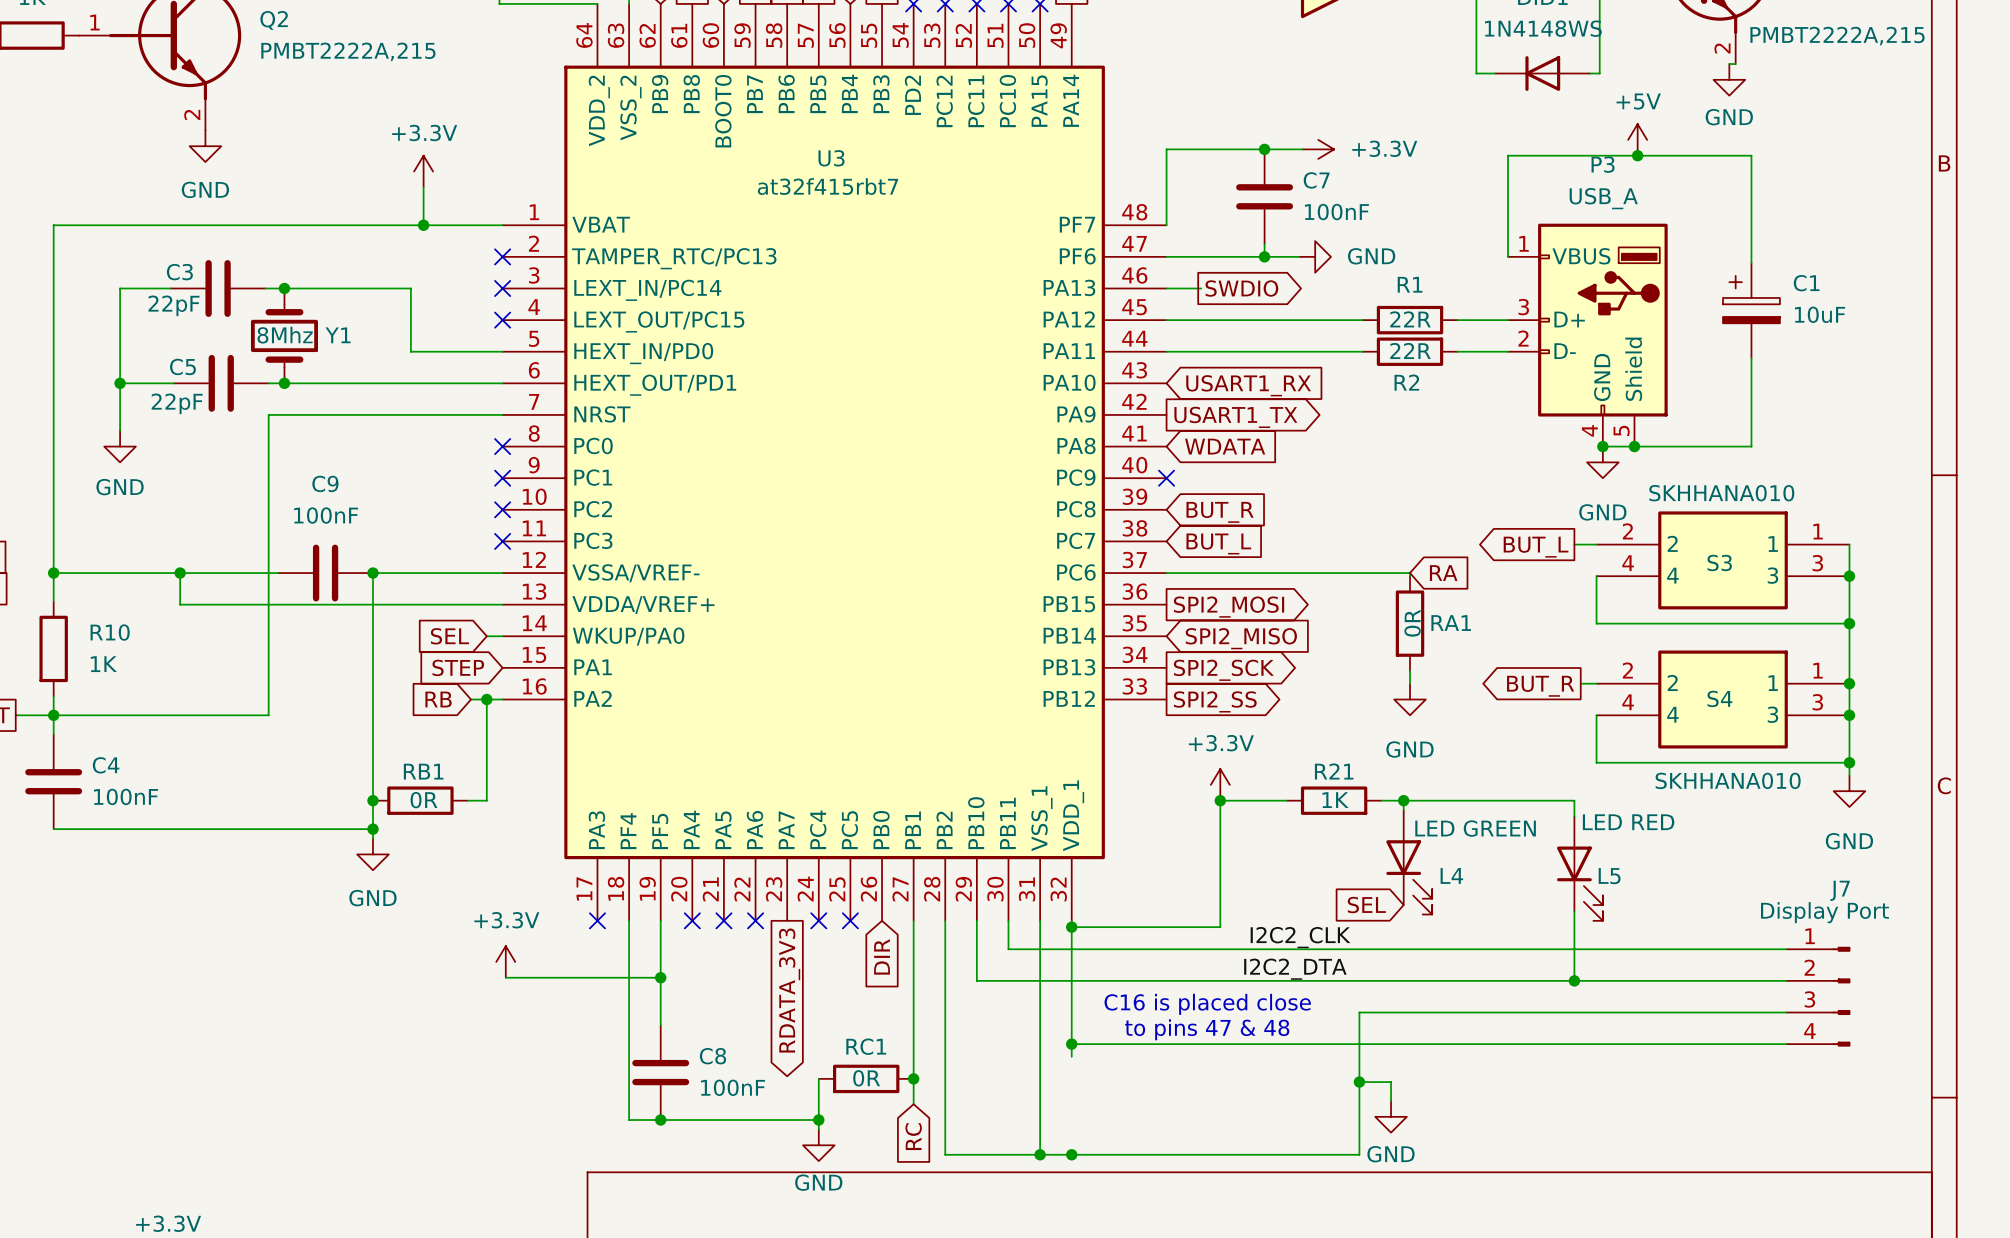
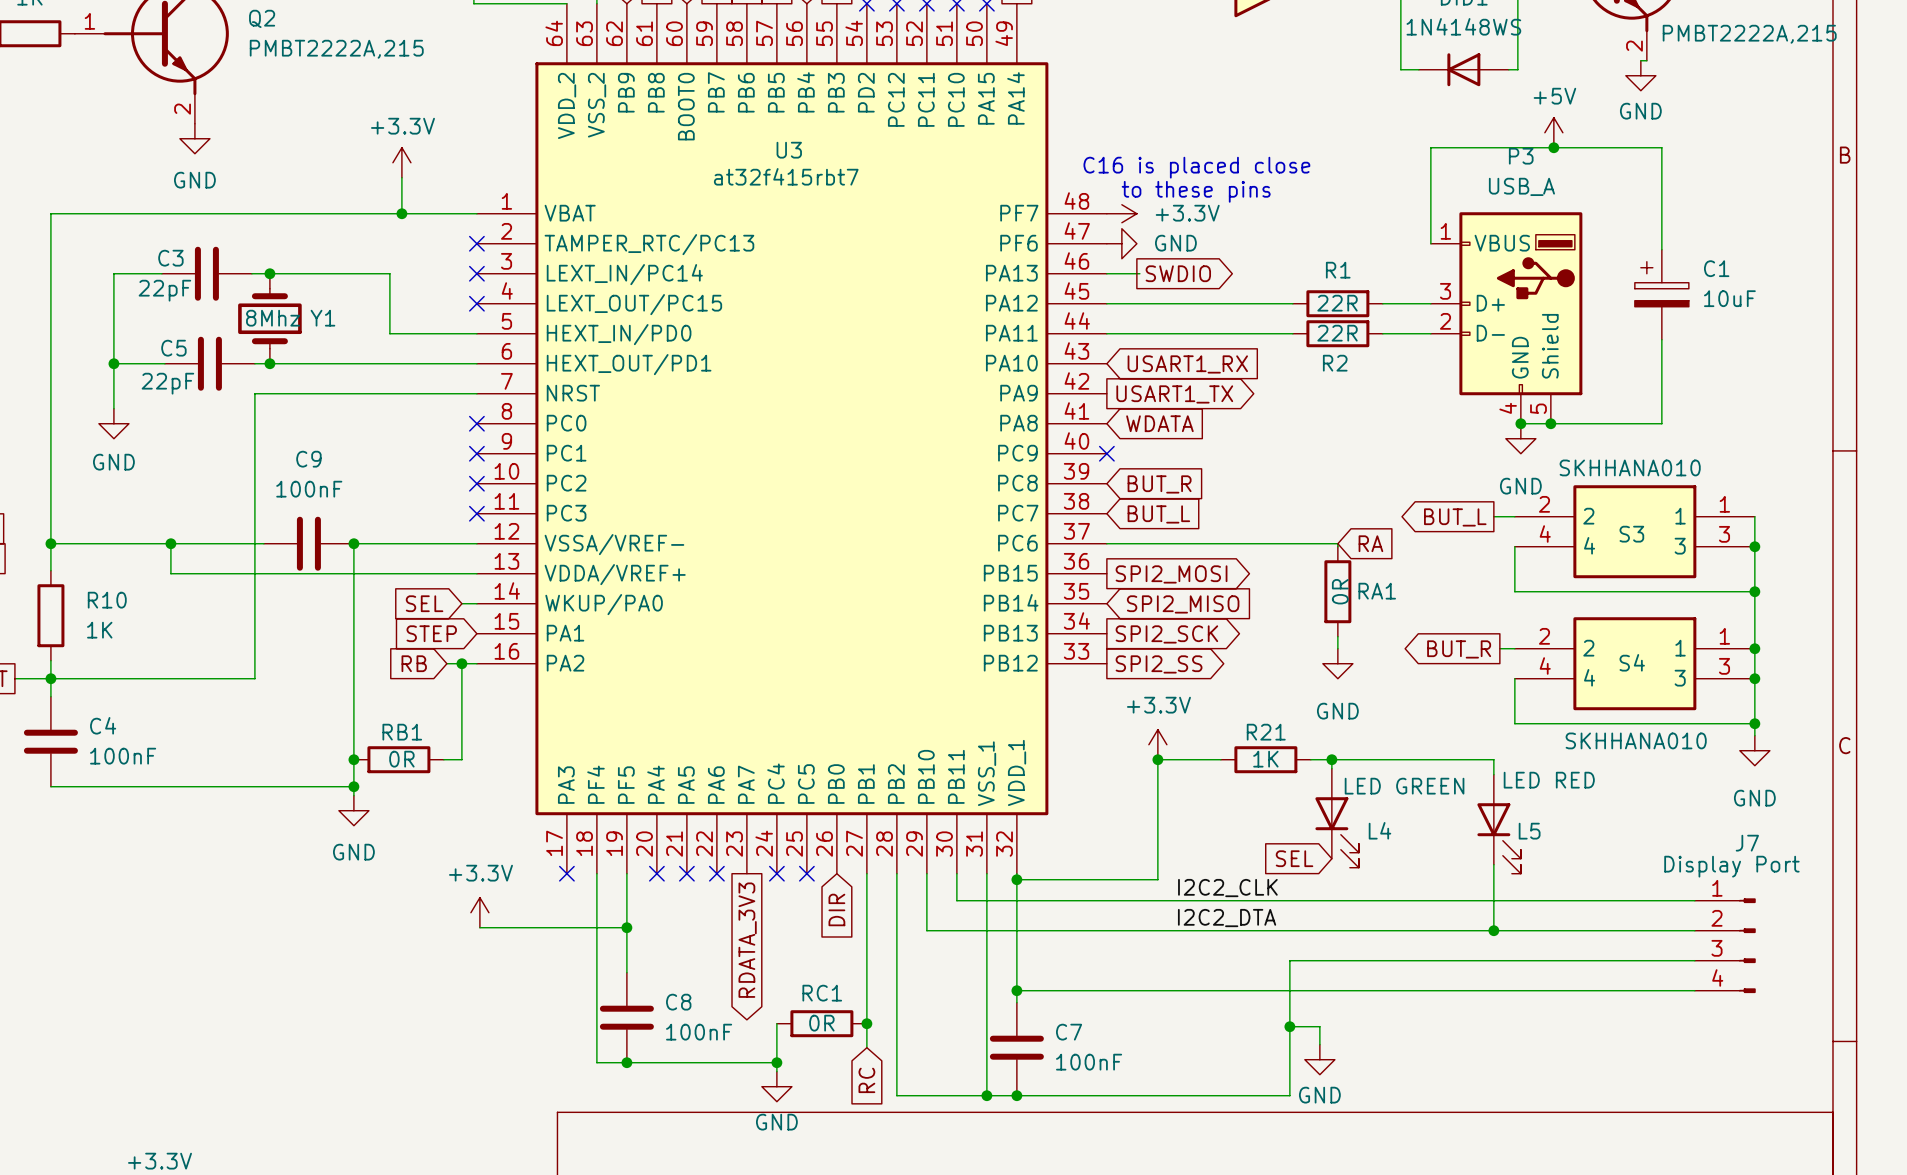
junction: (1264, 149) -> none
wire: (1302, 149) (1166, 149) (1166, 225) -> none
power symbol position: +3.3V (1318, 149) -> +3.3V (1121, 213)
text: none -> C16 is placed close (1196, 167)
C7 position: (1264, 196) -> (1016, 1047)
text: none -> to these pins (1196, 191)
wire: (1264, 244) (1264, 256) -> none
wire: (1166, 256) (1299, 256) -> none
junction: (1264, 256) -> none
power symbol position: GND (1315, 256) -> GND (1121, 243)
text: C16 is placed close (1207, 1004) -> none
text: to pins 47 & 48 (1207, 1029) -> none

